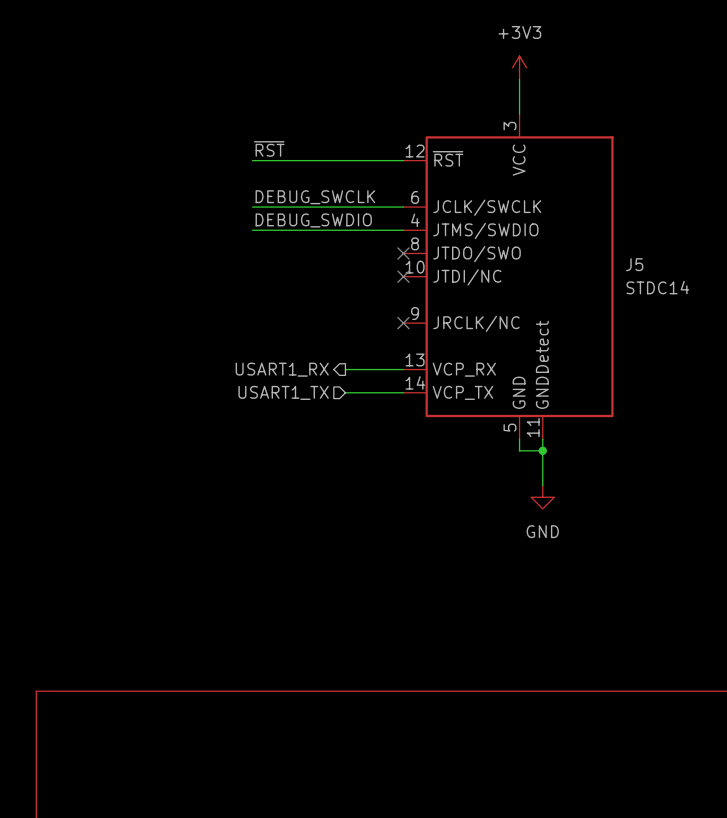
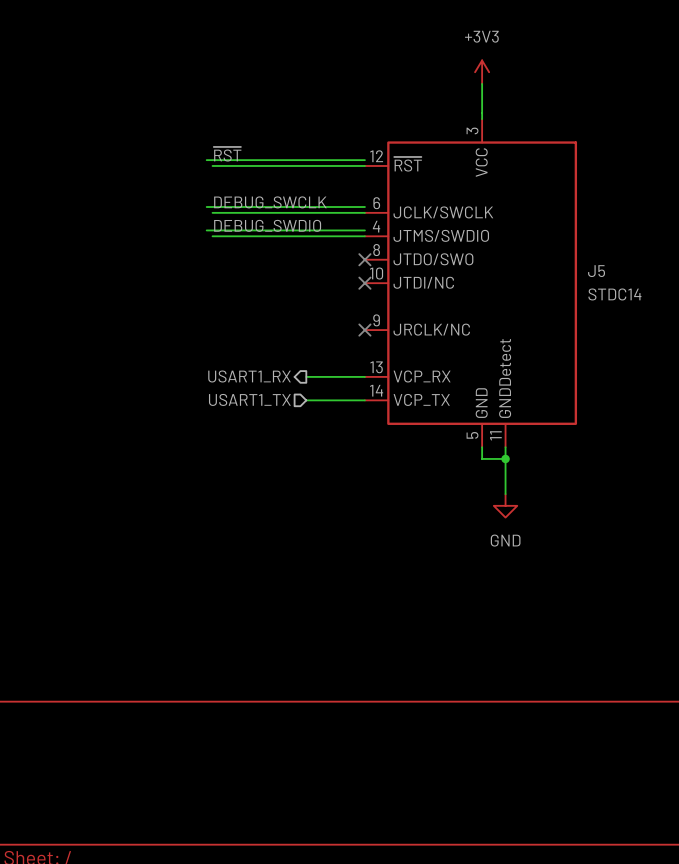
wire: none -> (206, 160) (364, 160)
wire: none -> (206, 207) (364, 207)
wire: none -> (206, 230) (364, 230)

